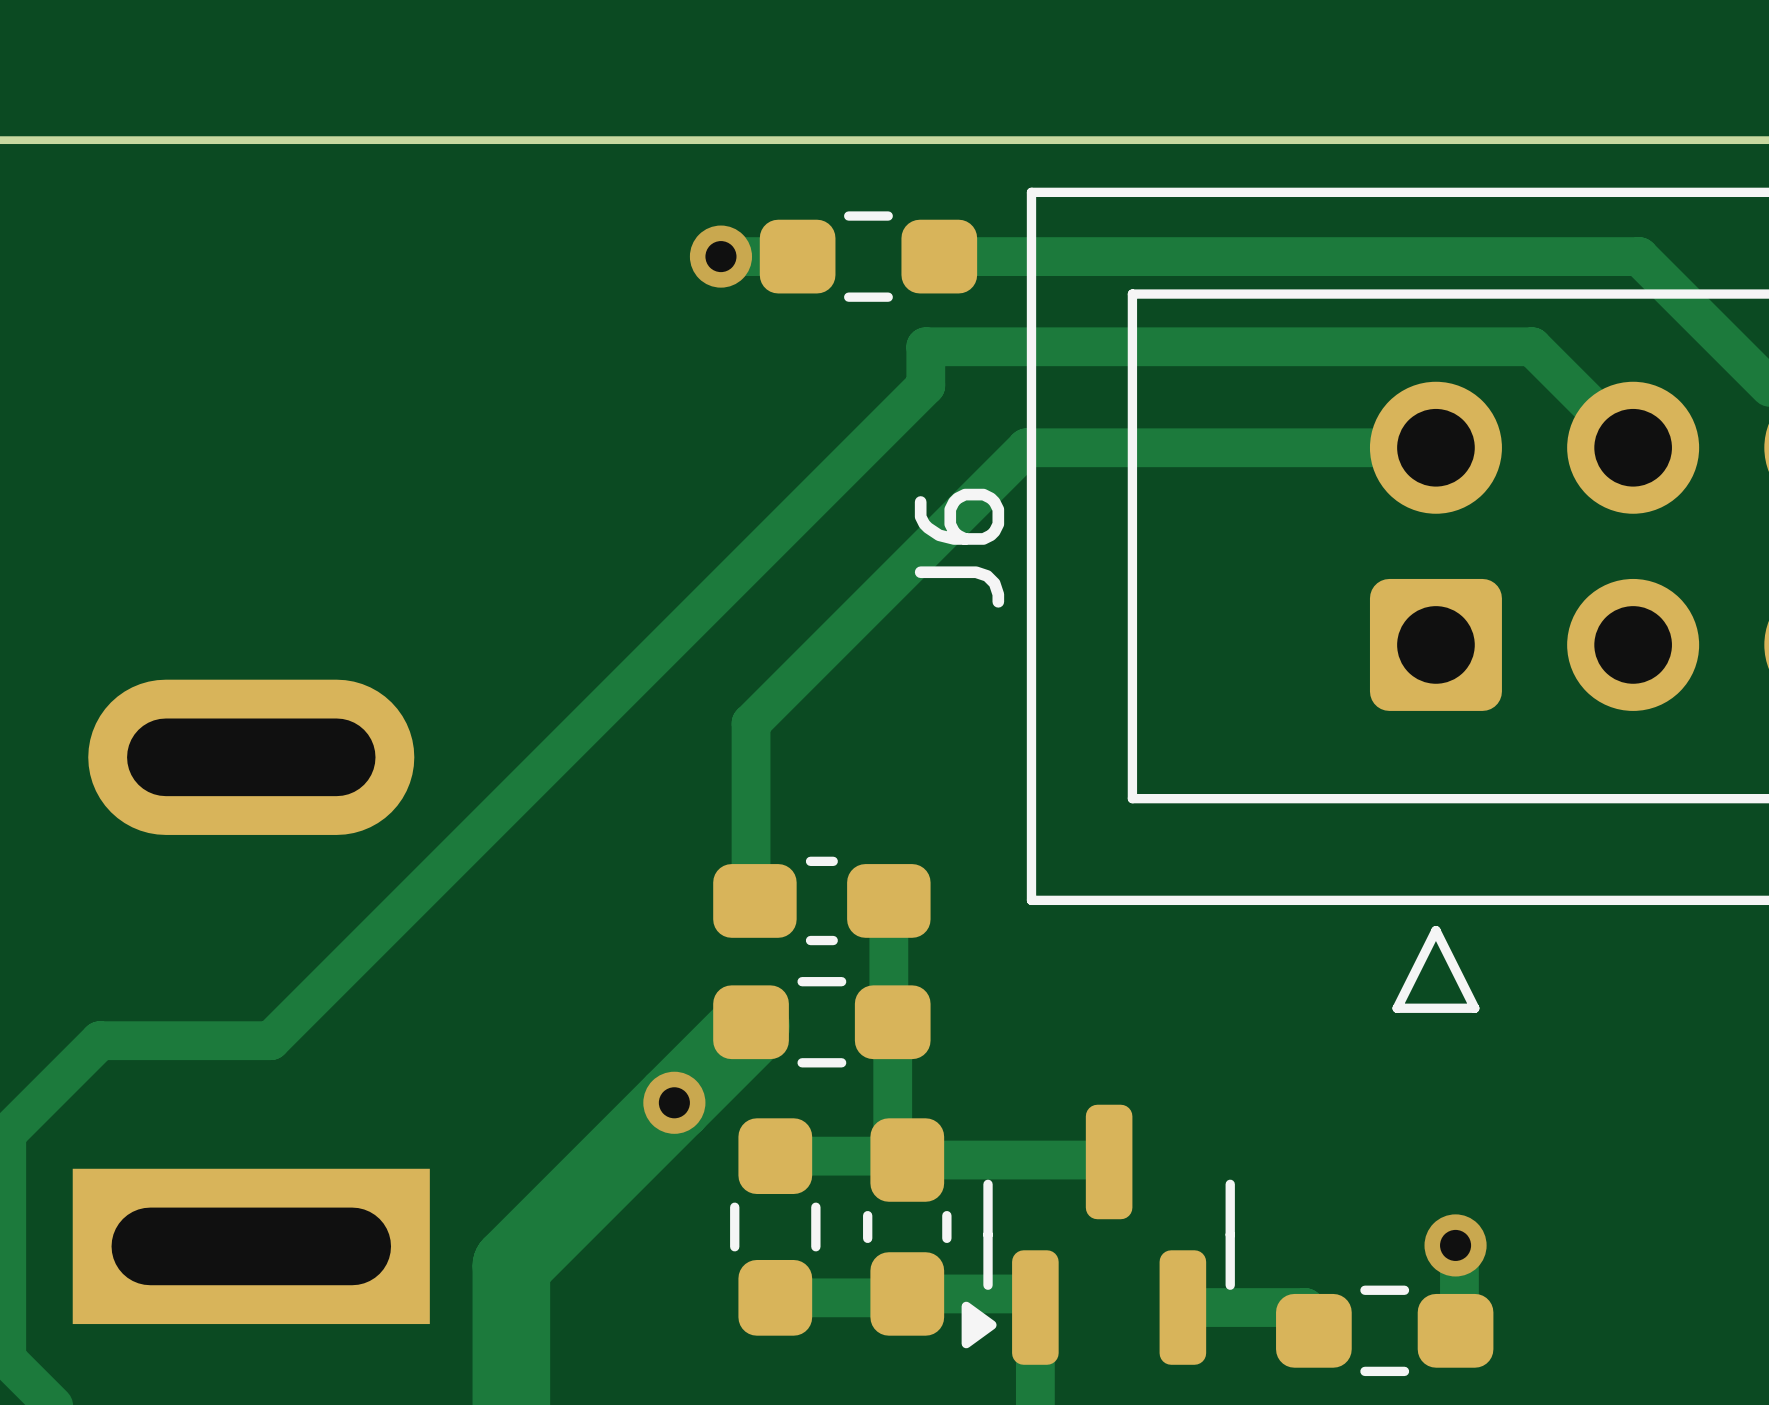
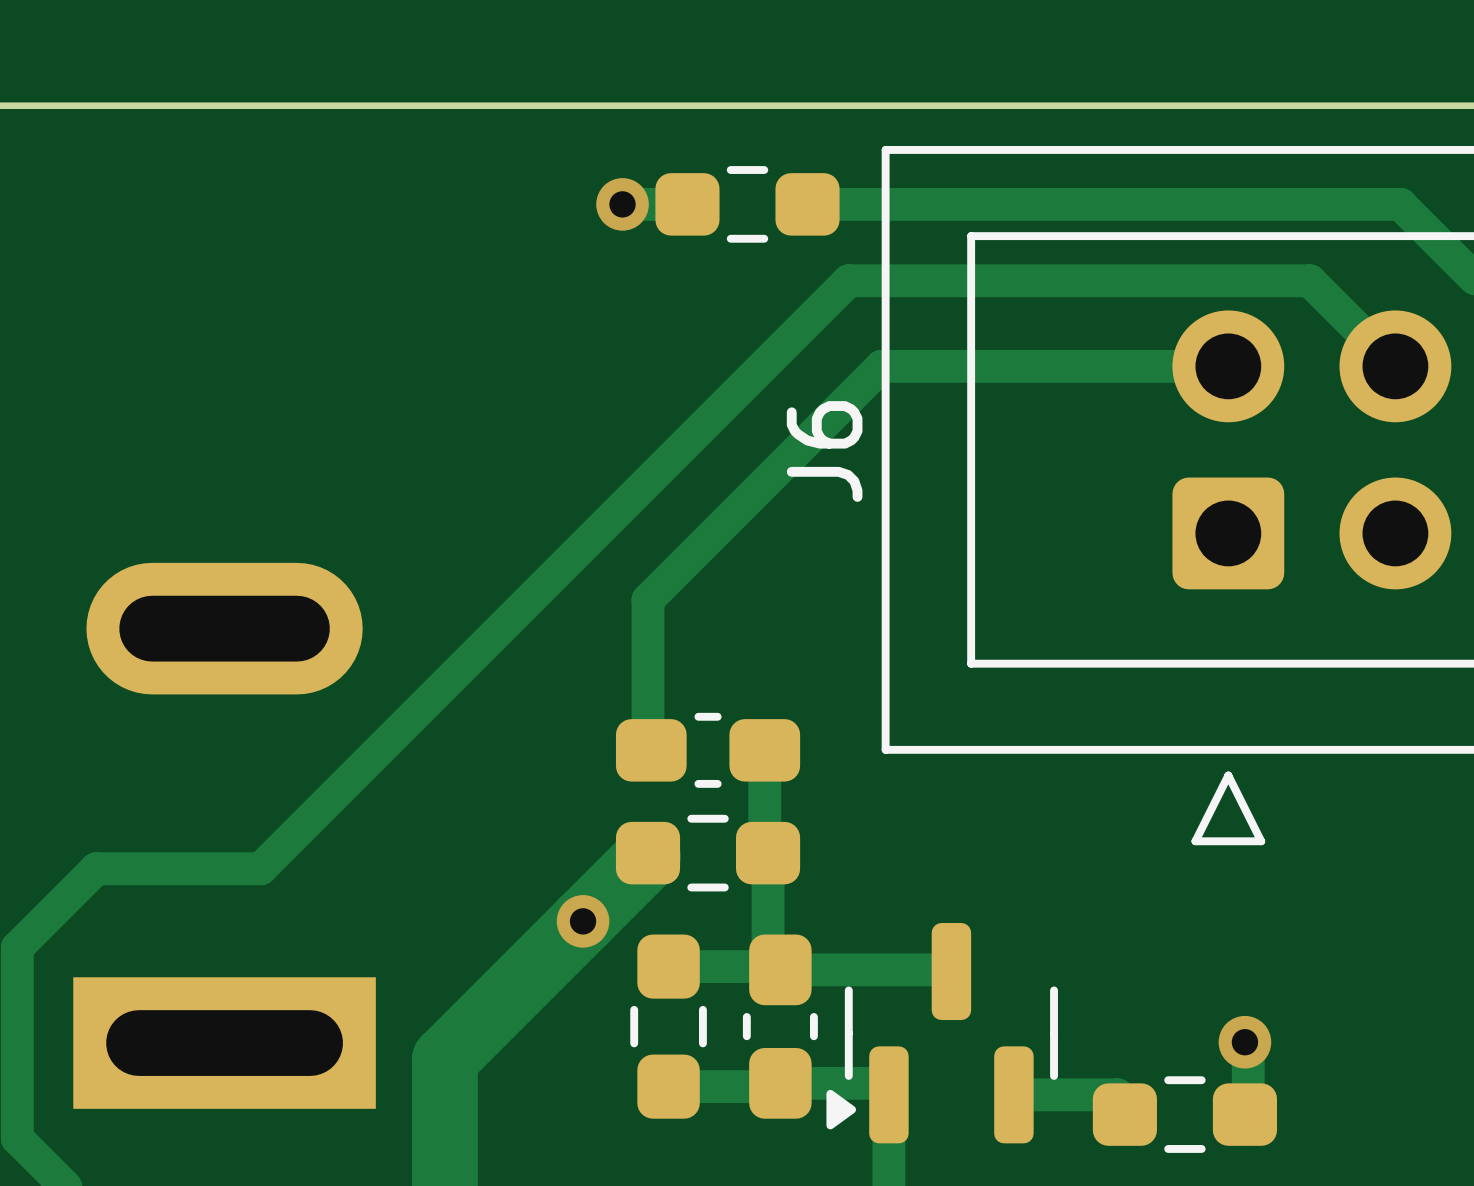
track: (987, 346) (925, 346) (925, 385) (270, 1040) -> (848, 280) (260, 868) (241, 868)

